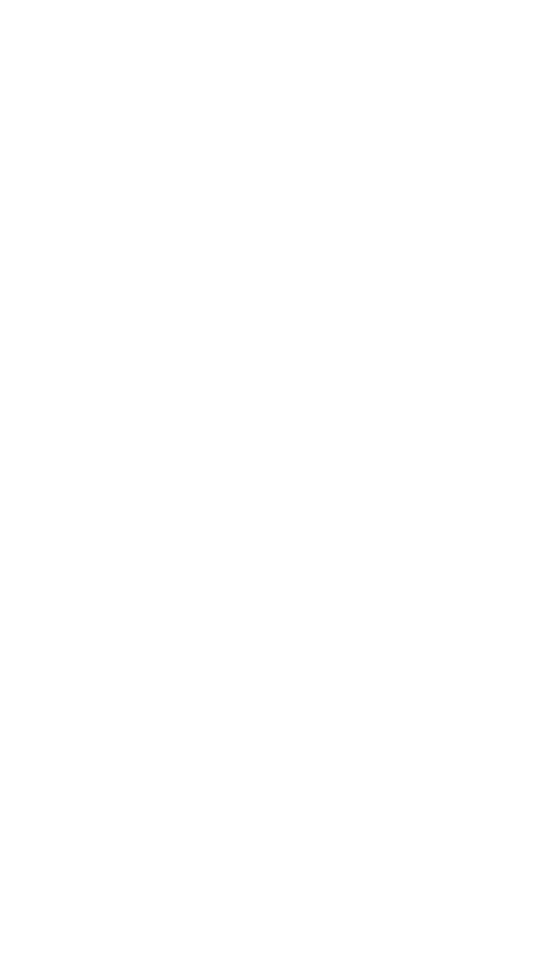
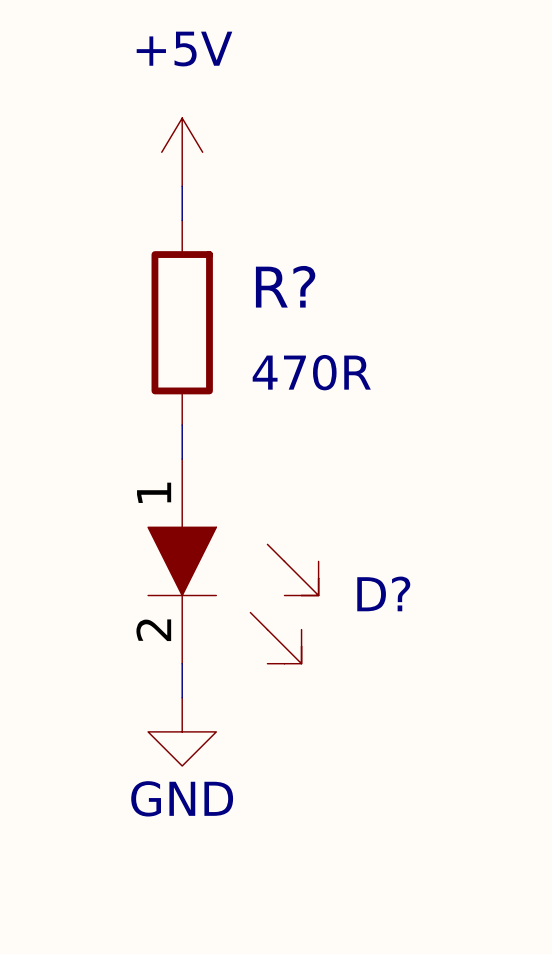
power symbol: none -> +5V (182, 152)
wire: none -> (182, 186) (182, 220)
R?: none -> (182, 322)
wire: none -> (182, 425) (182, 459)
D?: none -> (233, 561)
wire: none -> (182, 663) (182, 697)
power symbol: none -> GND (182, 731)

